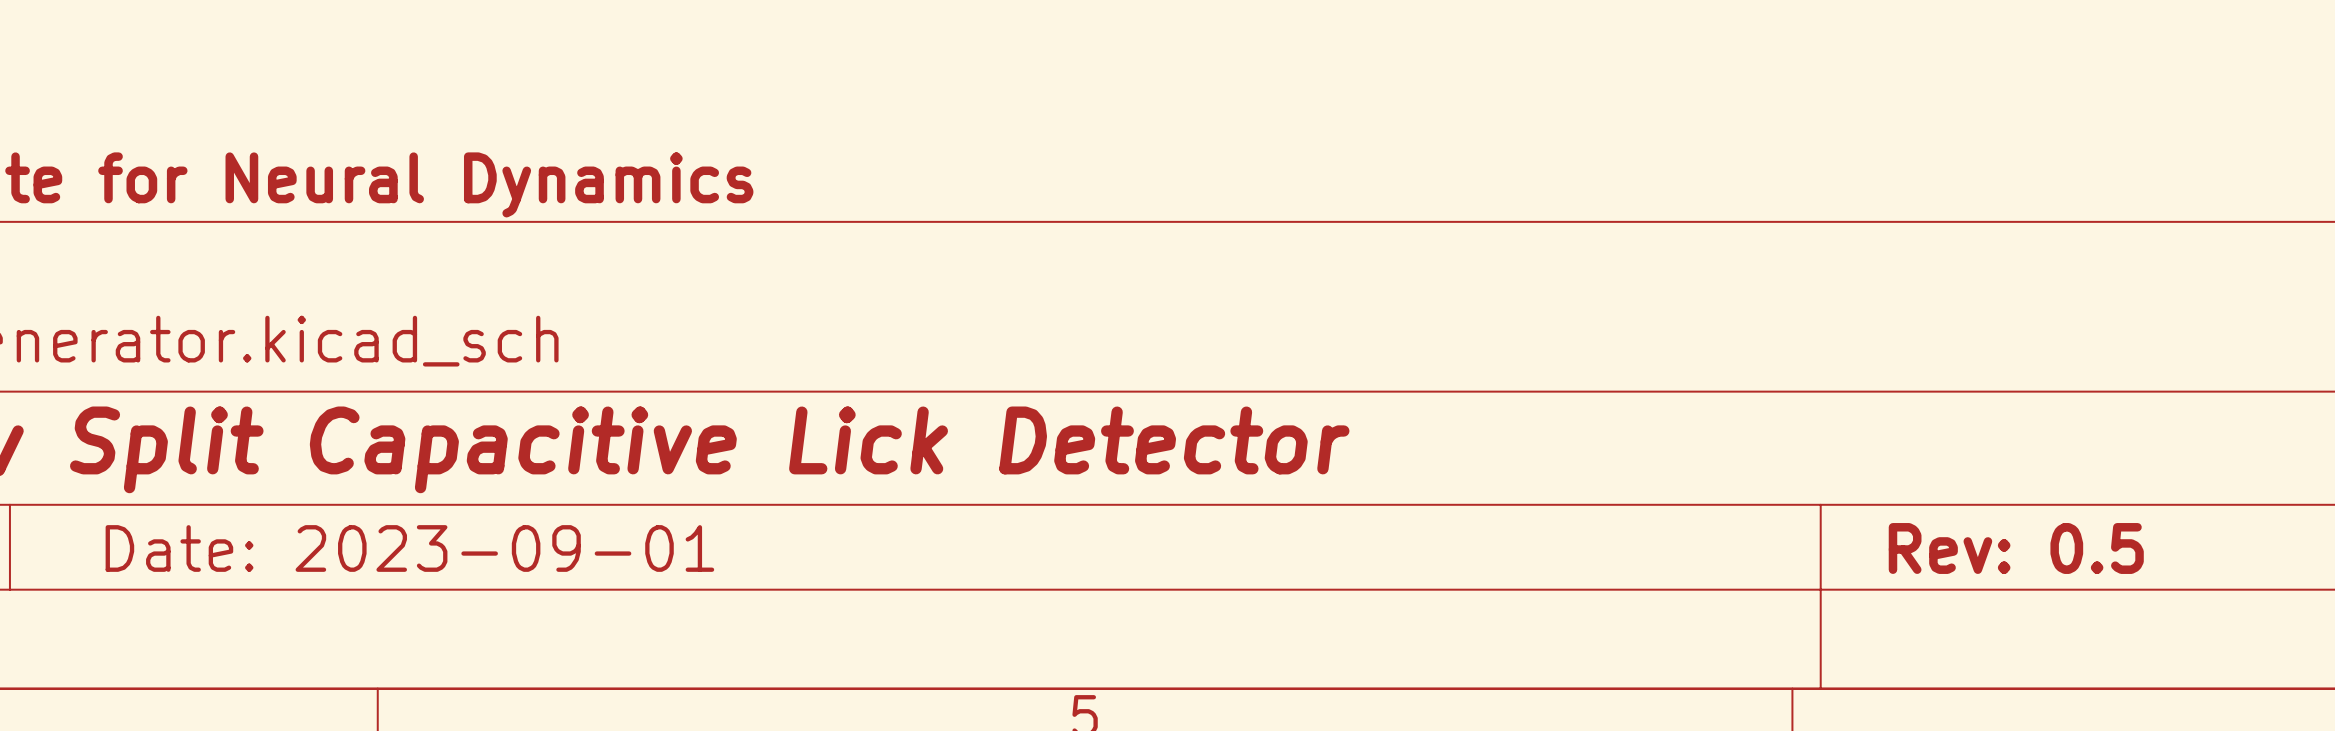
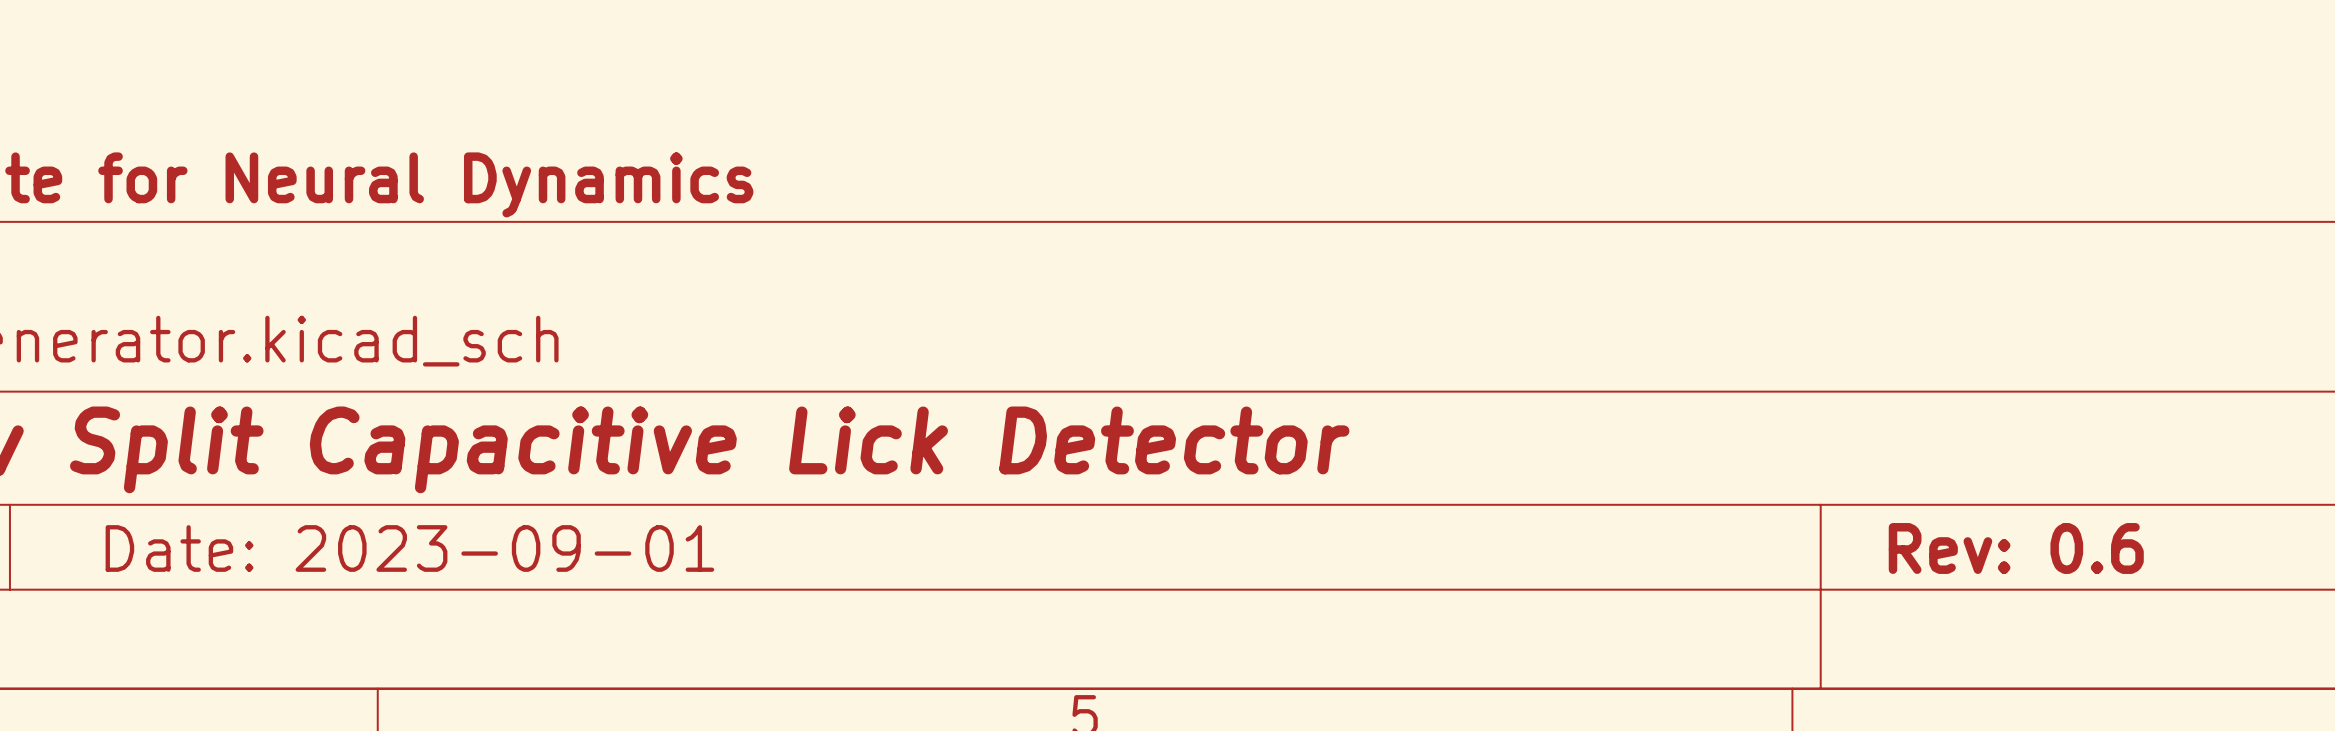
title block: Rev: 0.5 (2016, 548) -> Rev: 0.6 (2016, 548)

